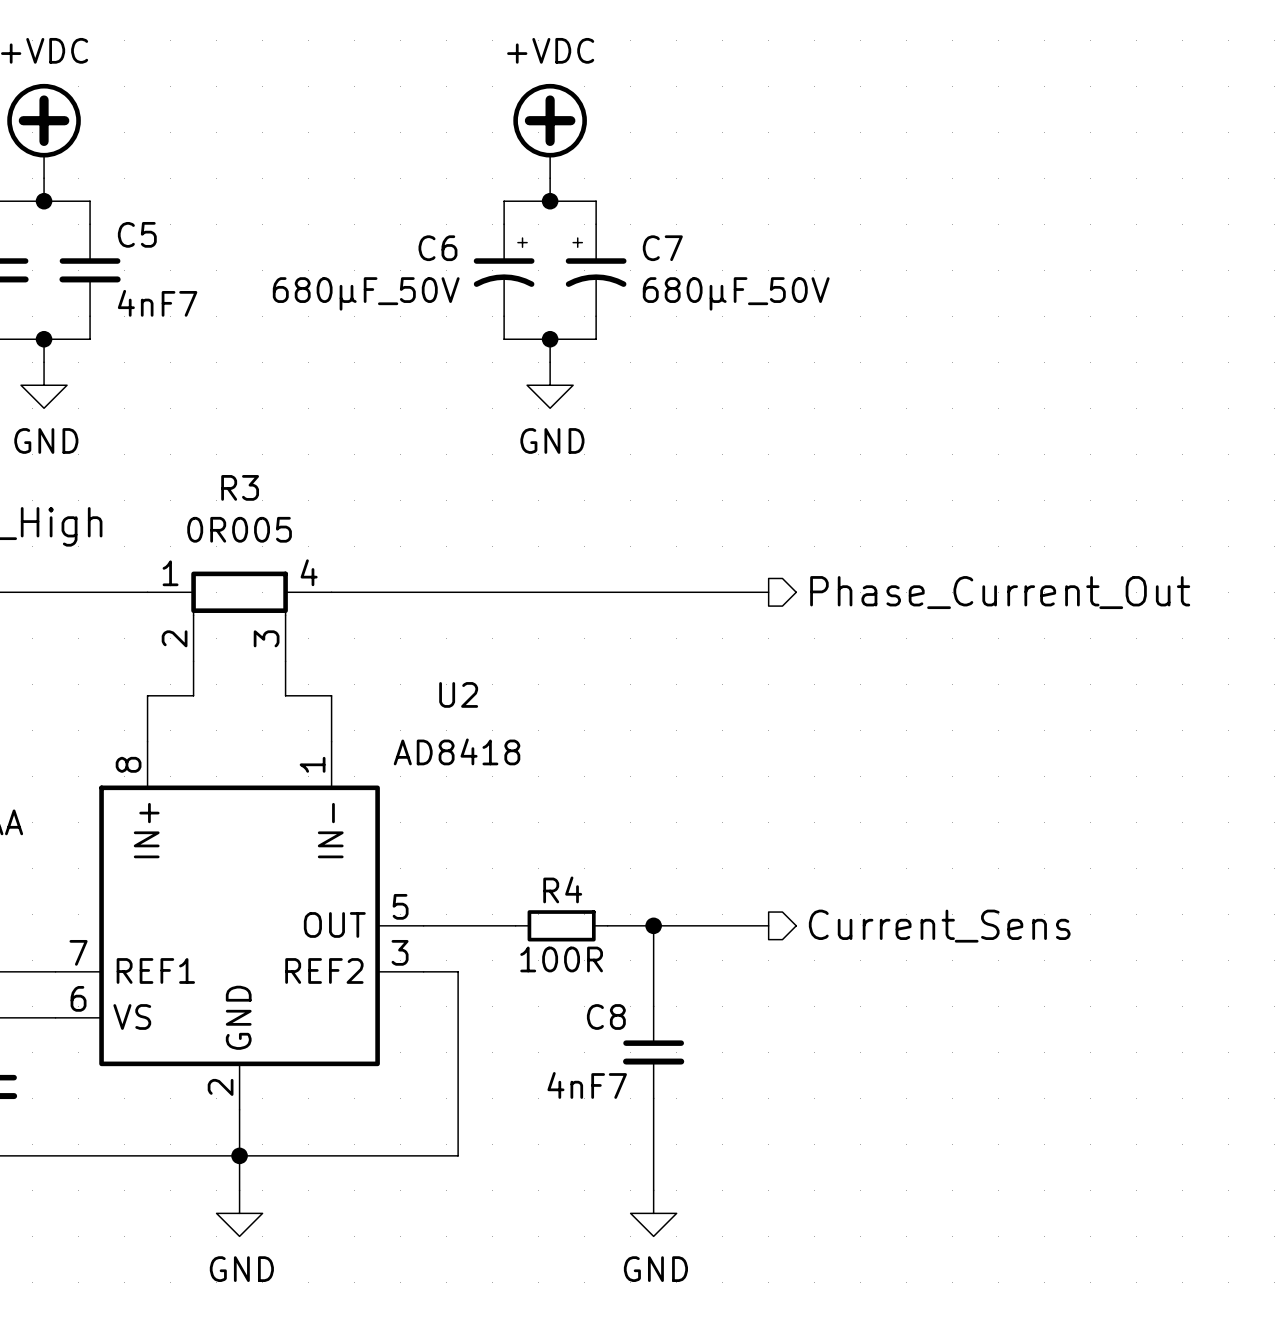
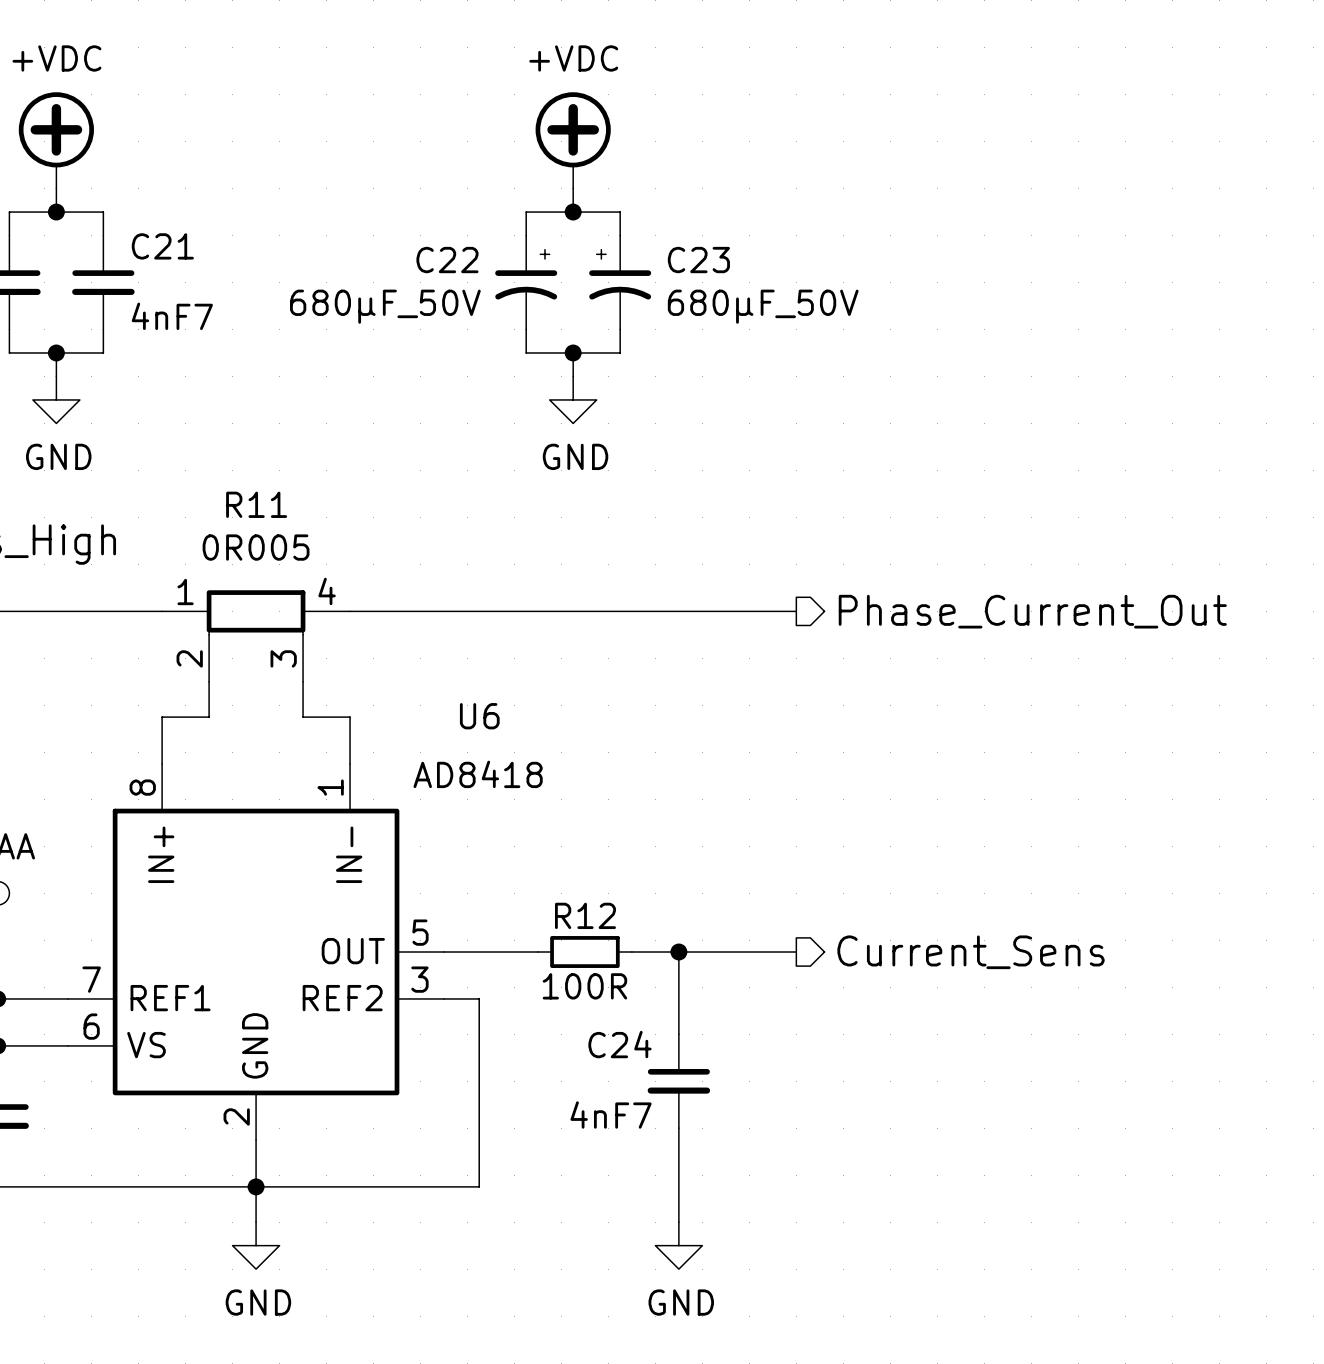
C5 name: C5 (137, 234) -> C21 (162, 246)
C6 name: C6 (437, 248) -> C22 (447, 260)
C7 name: C7 (662, 248) -> C23 (698, 260)
R3 name: R3 (240, 487) -> R11 (256, 504)
U2 name: U2 (458, 694) -> U6 (479, 716)
R4 name: R4 (562, 889) -> R12 (585, 915)
C8 name: C8 (606, 1016) -> C24 (619, 1044)

